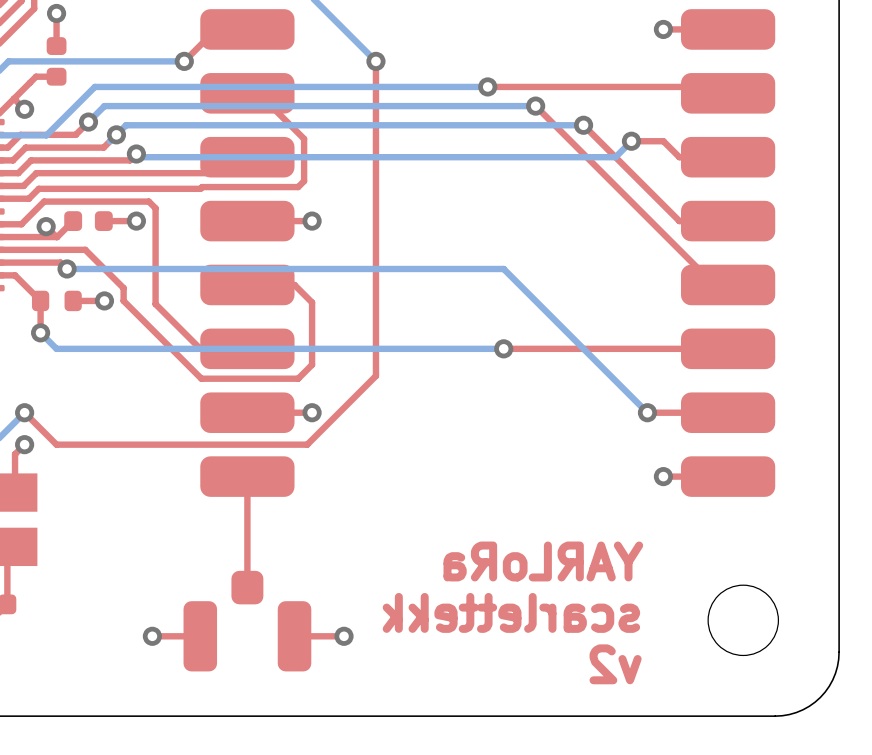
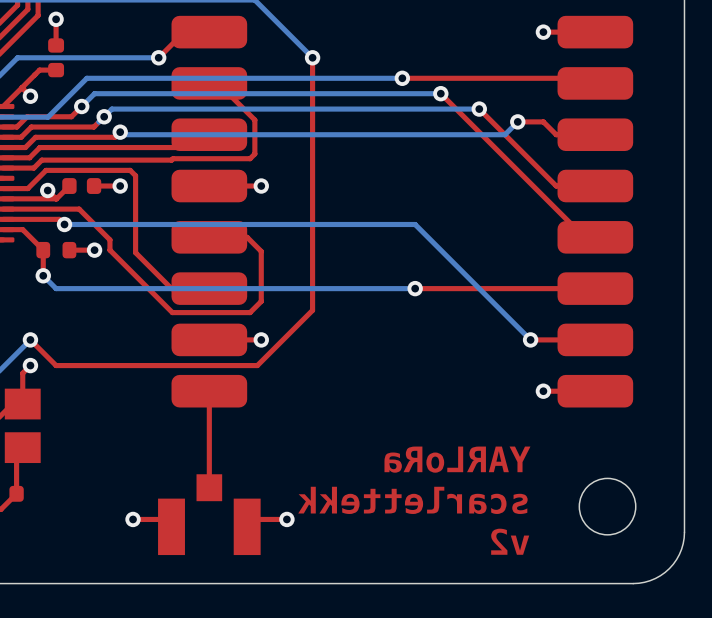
part footprint: [183, 570, 312, 672] -> [158, 474, 261, 556]

